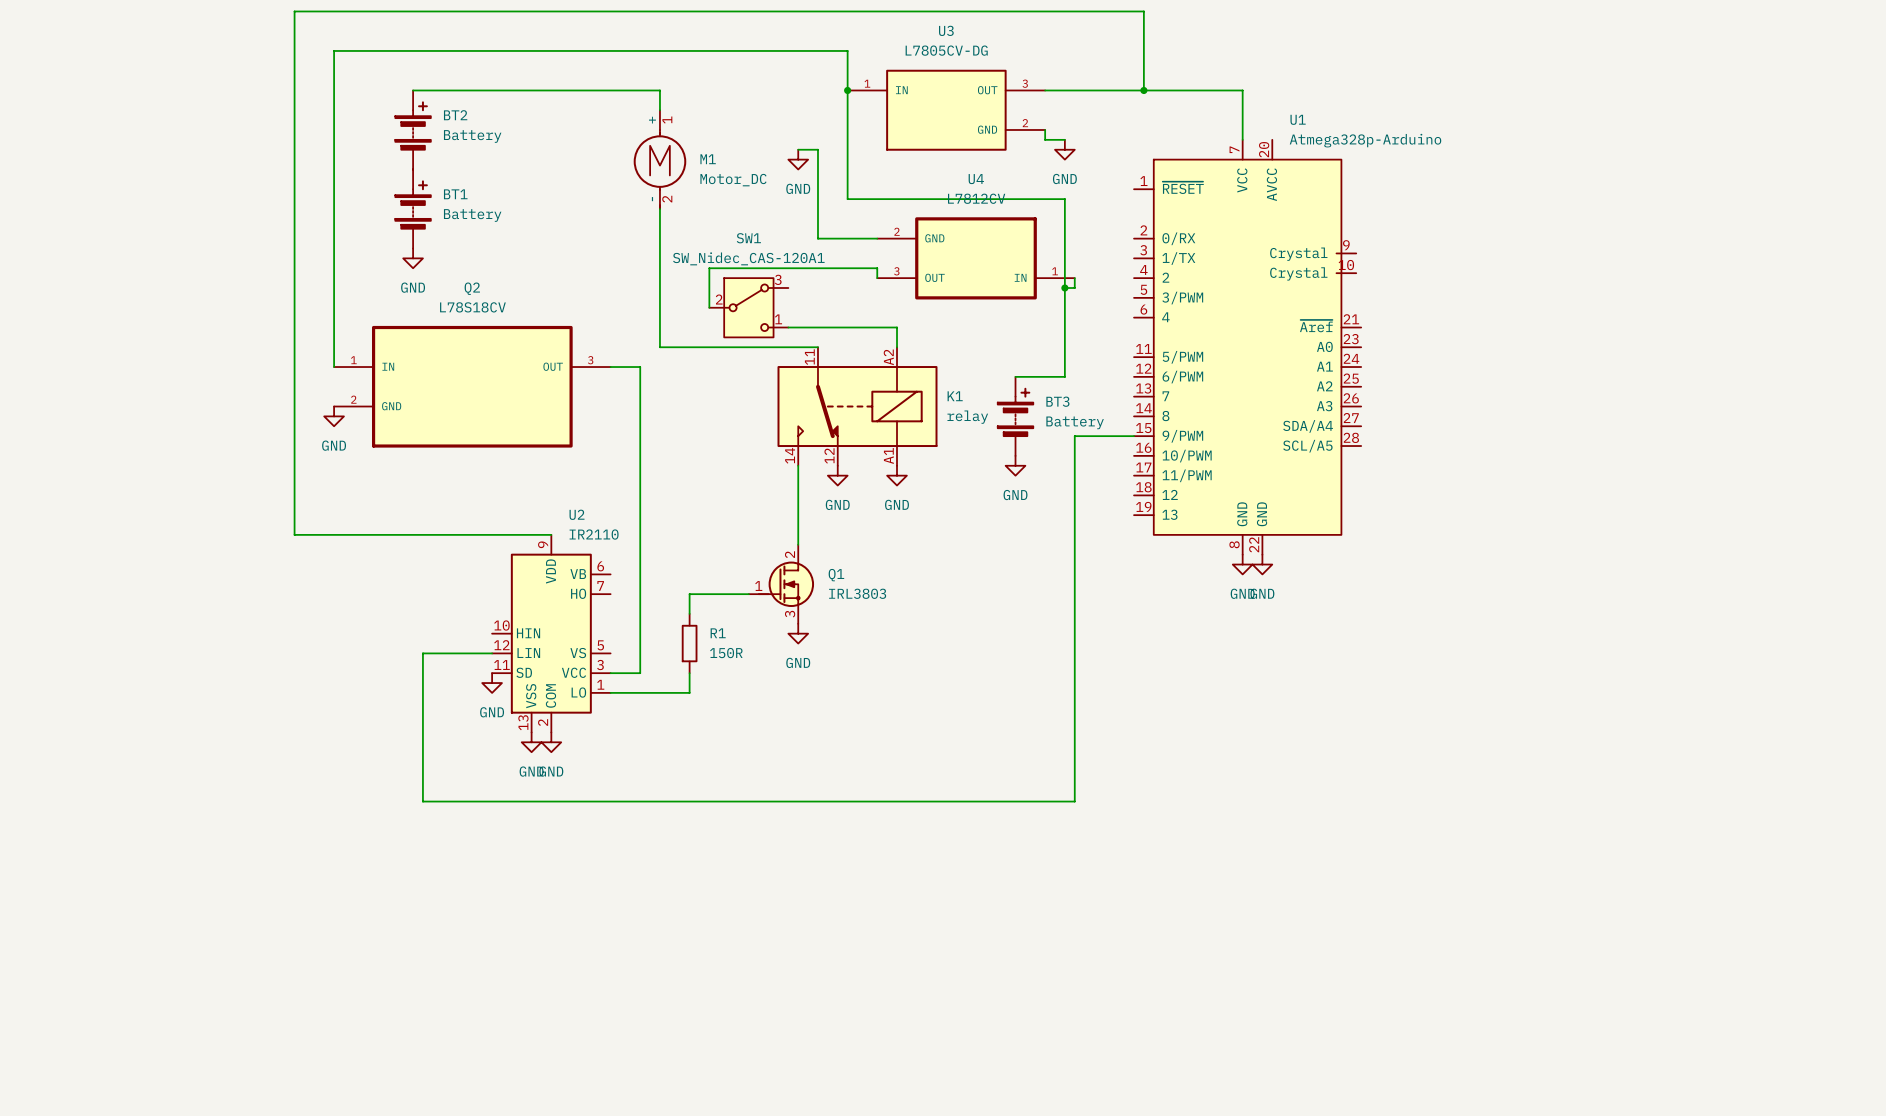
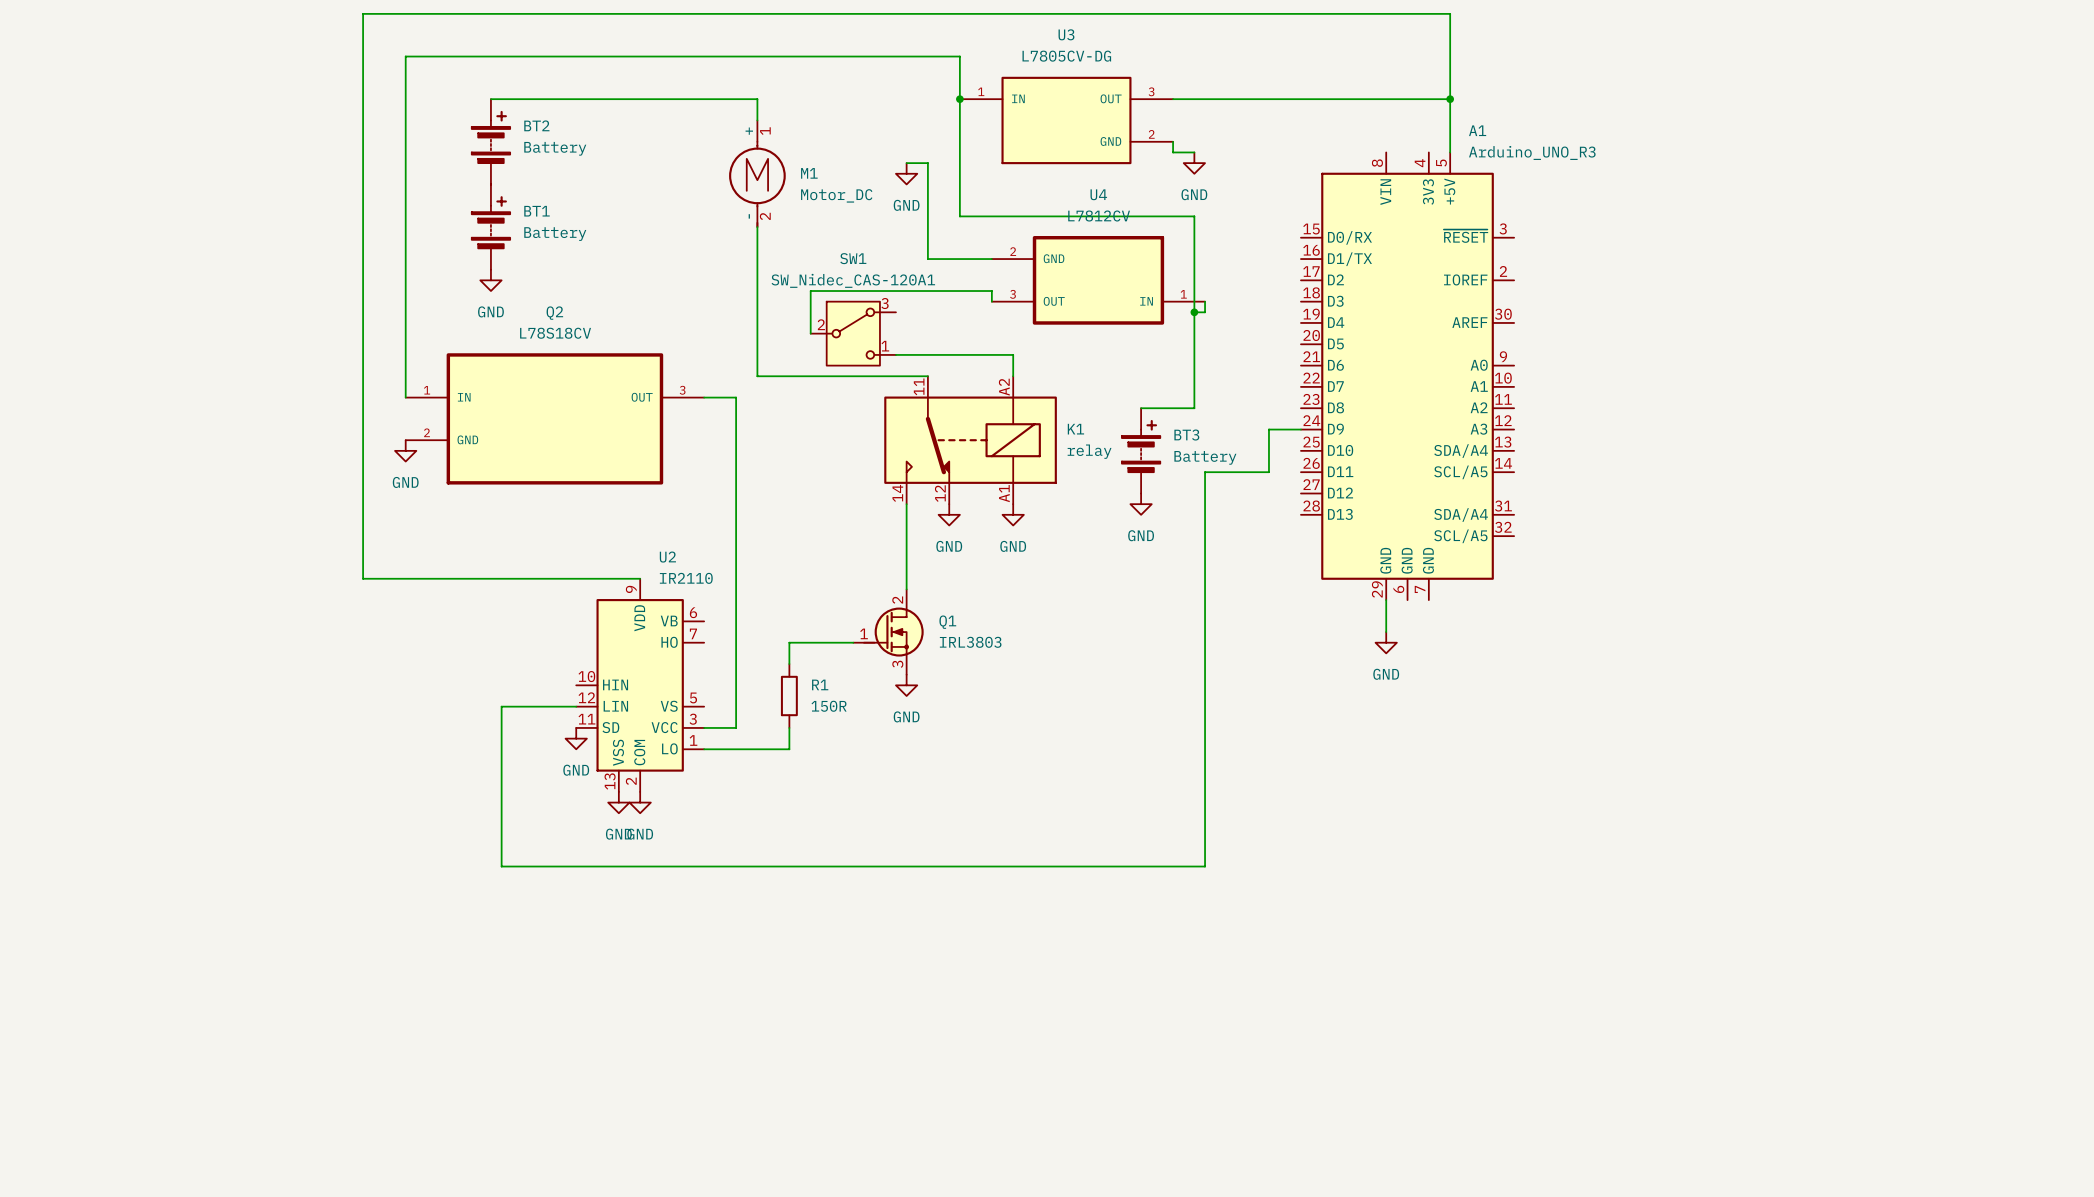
wire: (1143, 11) (1143, 90) -> (1279, 13) (1450, 13) (1450, 152)
junction: (1143, 90) -> none
wire: (1242, 90) (1242, 139) -> (1386, 99) (1450, 99)
junction: none -> (1450, 99)
U1: Atmega328p-Arduino (1247, 347) -> none
A1: none -> Arduino_UNO_R3 (1407, 376)
wire: none -> (1300, 429) (1268, 429) (1268, 472)
wire: none -> (1386, 600) (1386, 632)
power symbol: GND (1242, 564) -> none
power symbol: GND (1262, 564) -> none
power symbol: none -> GND (1386, 642)

